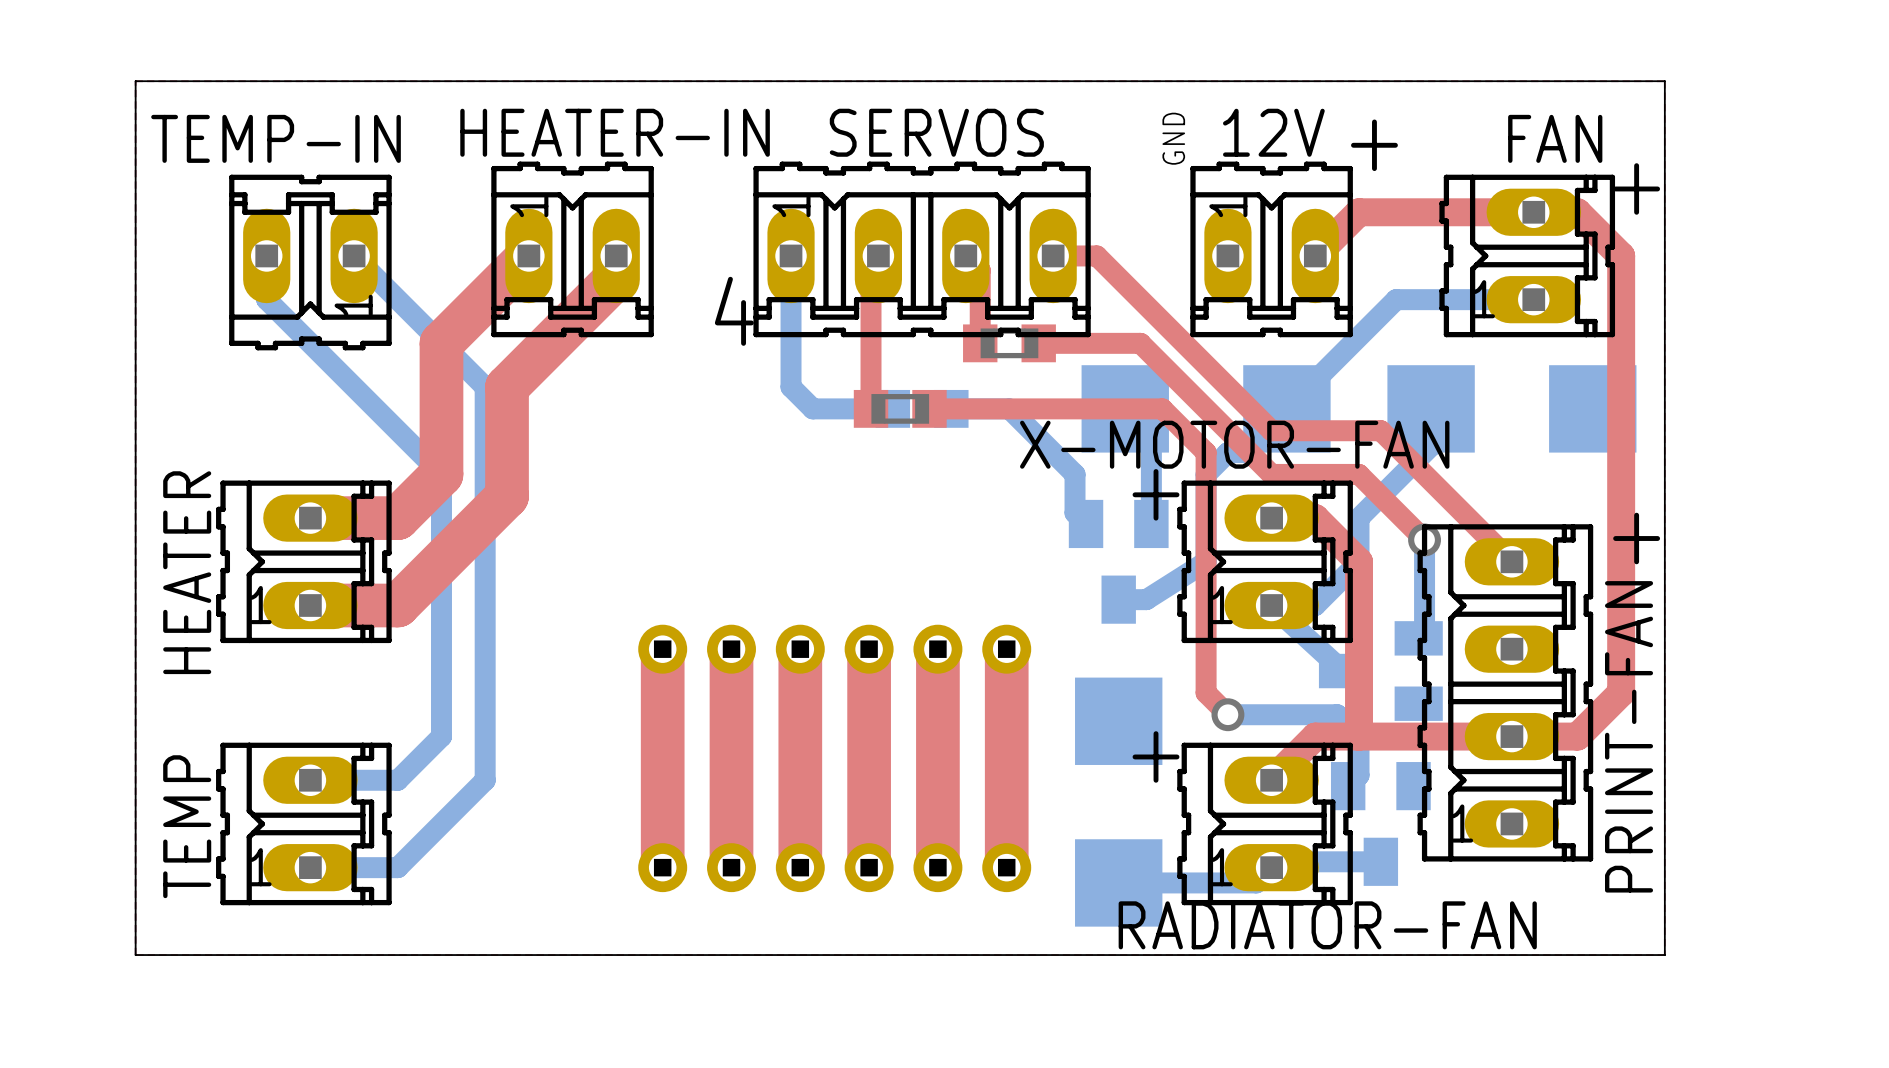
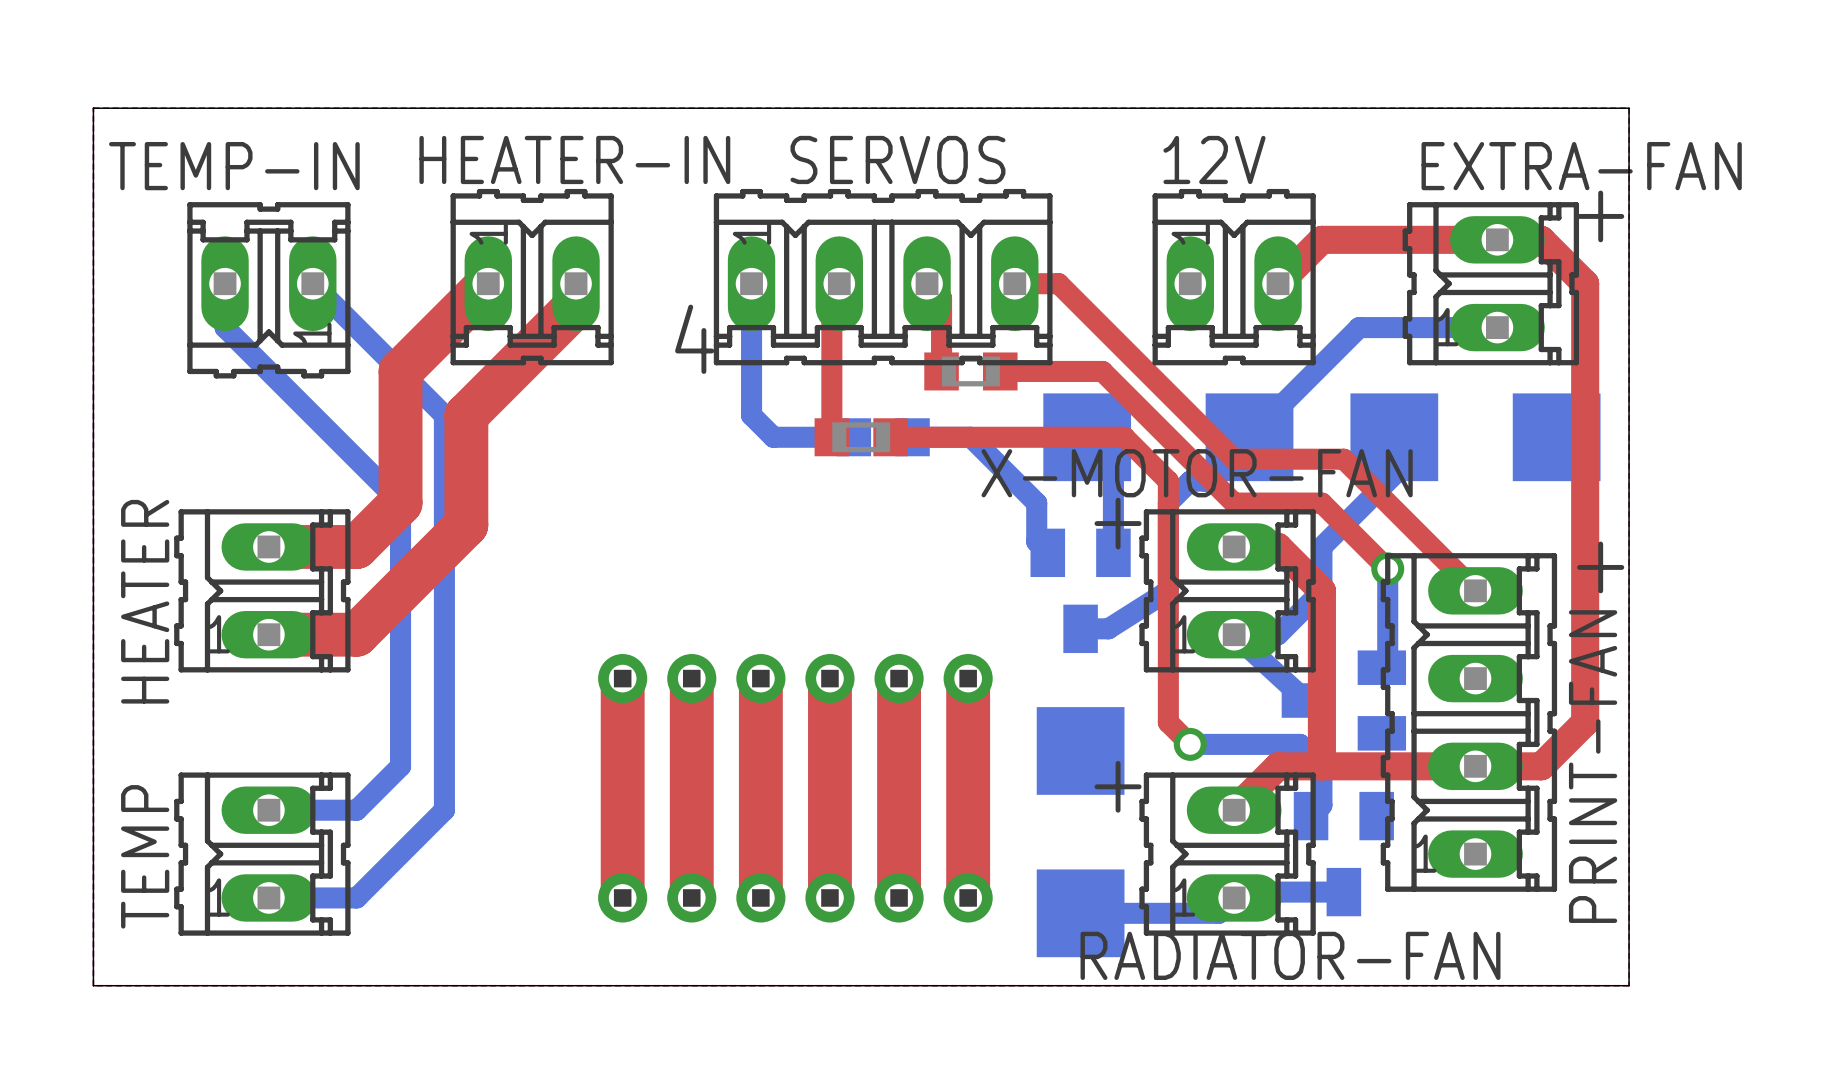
12V name position: 12V (1273, 132) -> 12V (1214, 159)
text: GND (1173, 138) -> none
FAN name: FAN (1555, 138) -> EXTRA-FAN (1581, 166)
text: + (1374, 145) -> none

